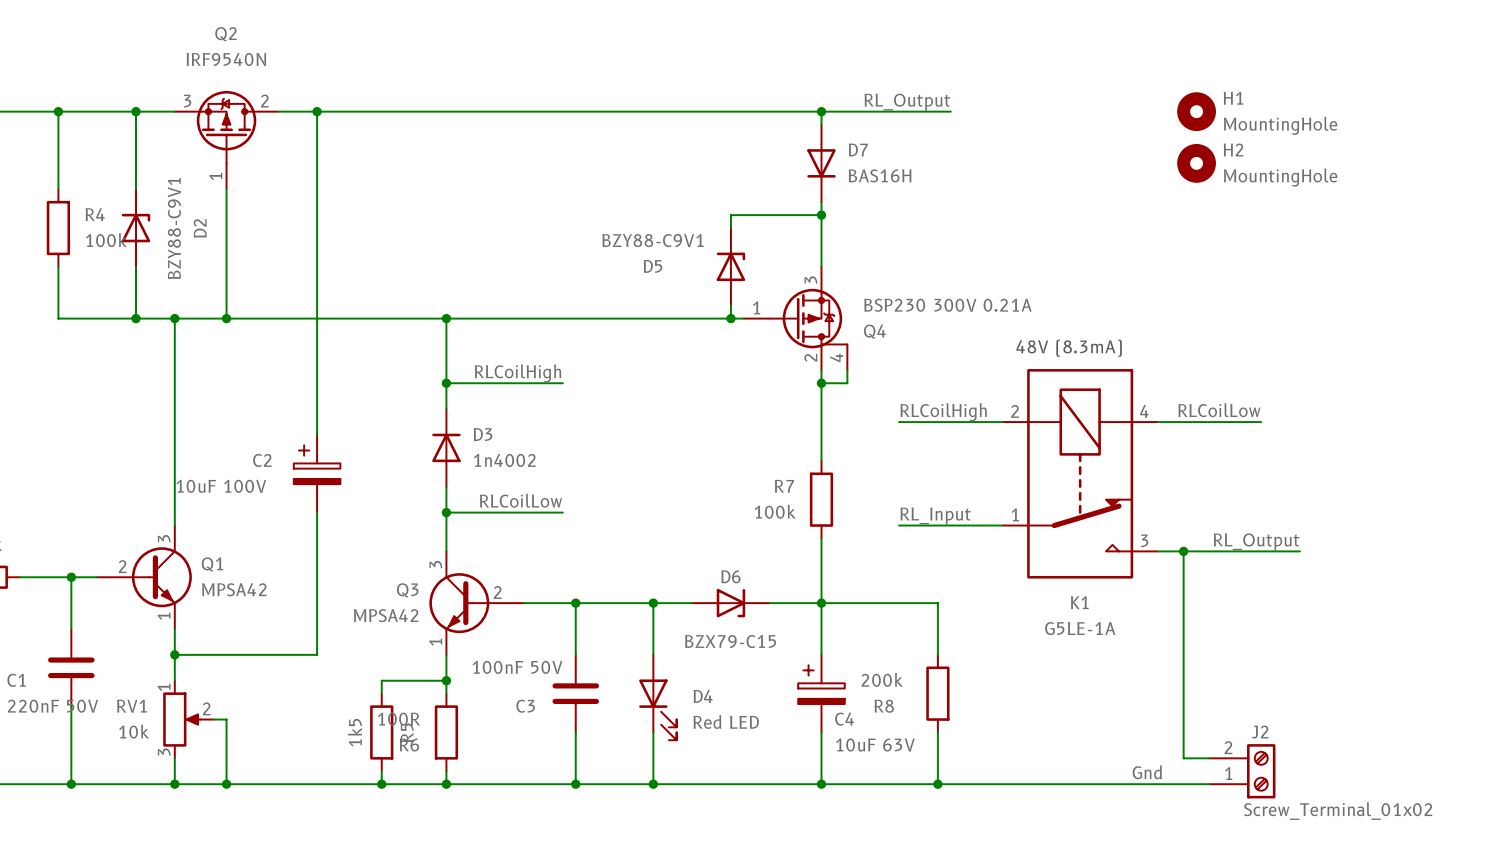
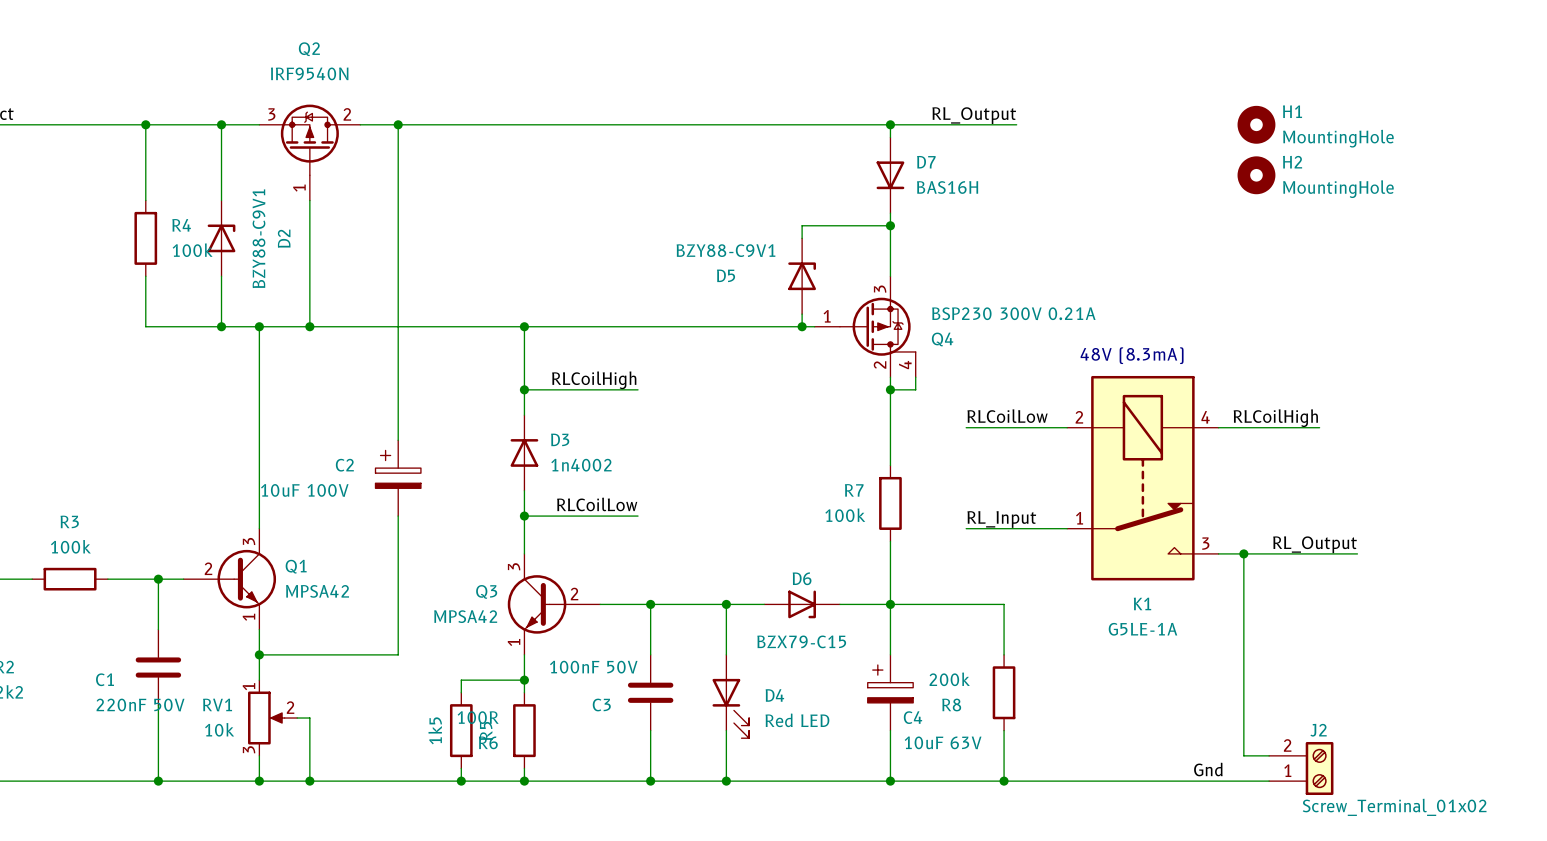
label: RLCoilLow (1219, 410) -> RLCoilHigh (1275, 418)
label: RLCoilHigh (943, 412) -> RLCoilLow (1007, 416)

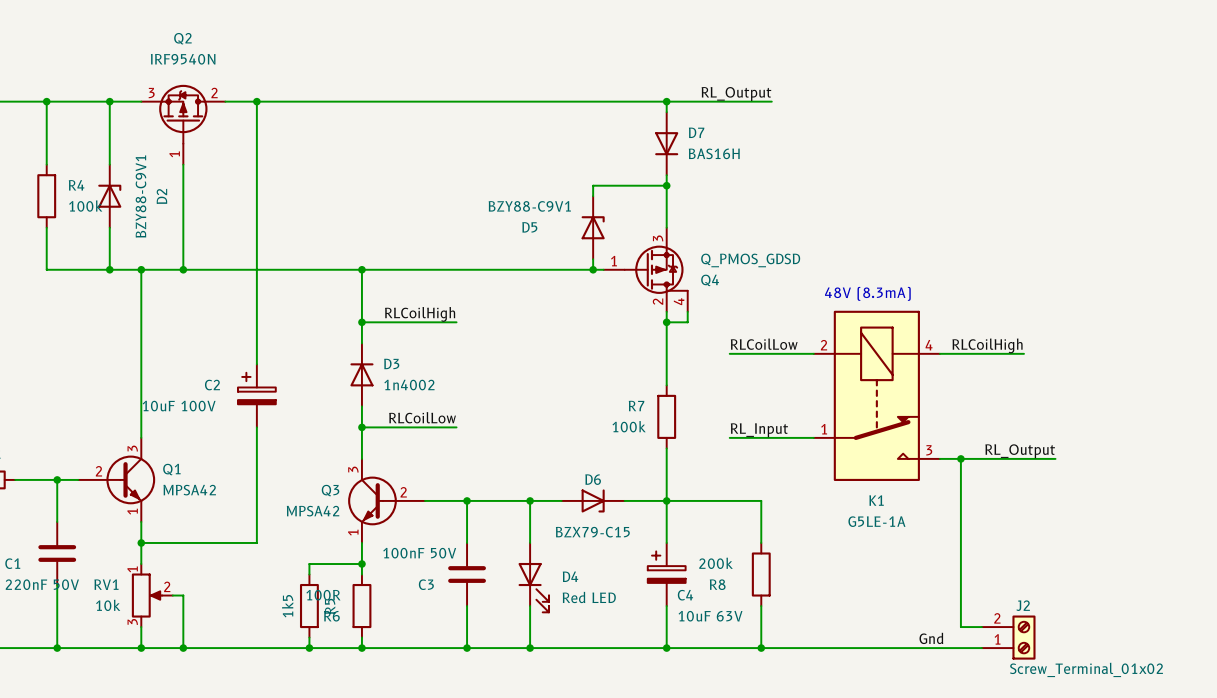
H1: MountingHole (1256, 124) -> none
H2: MountingHole (1256, 175) -> none
Q4 value: BSP230 300V 0.21A (1013, 313) -> Q_PMOS_GDSD (750, 260)

